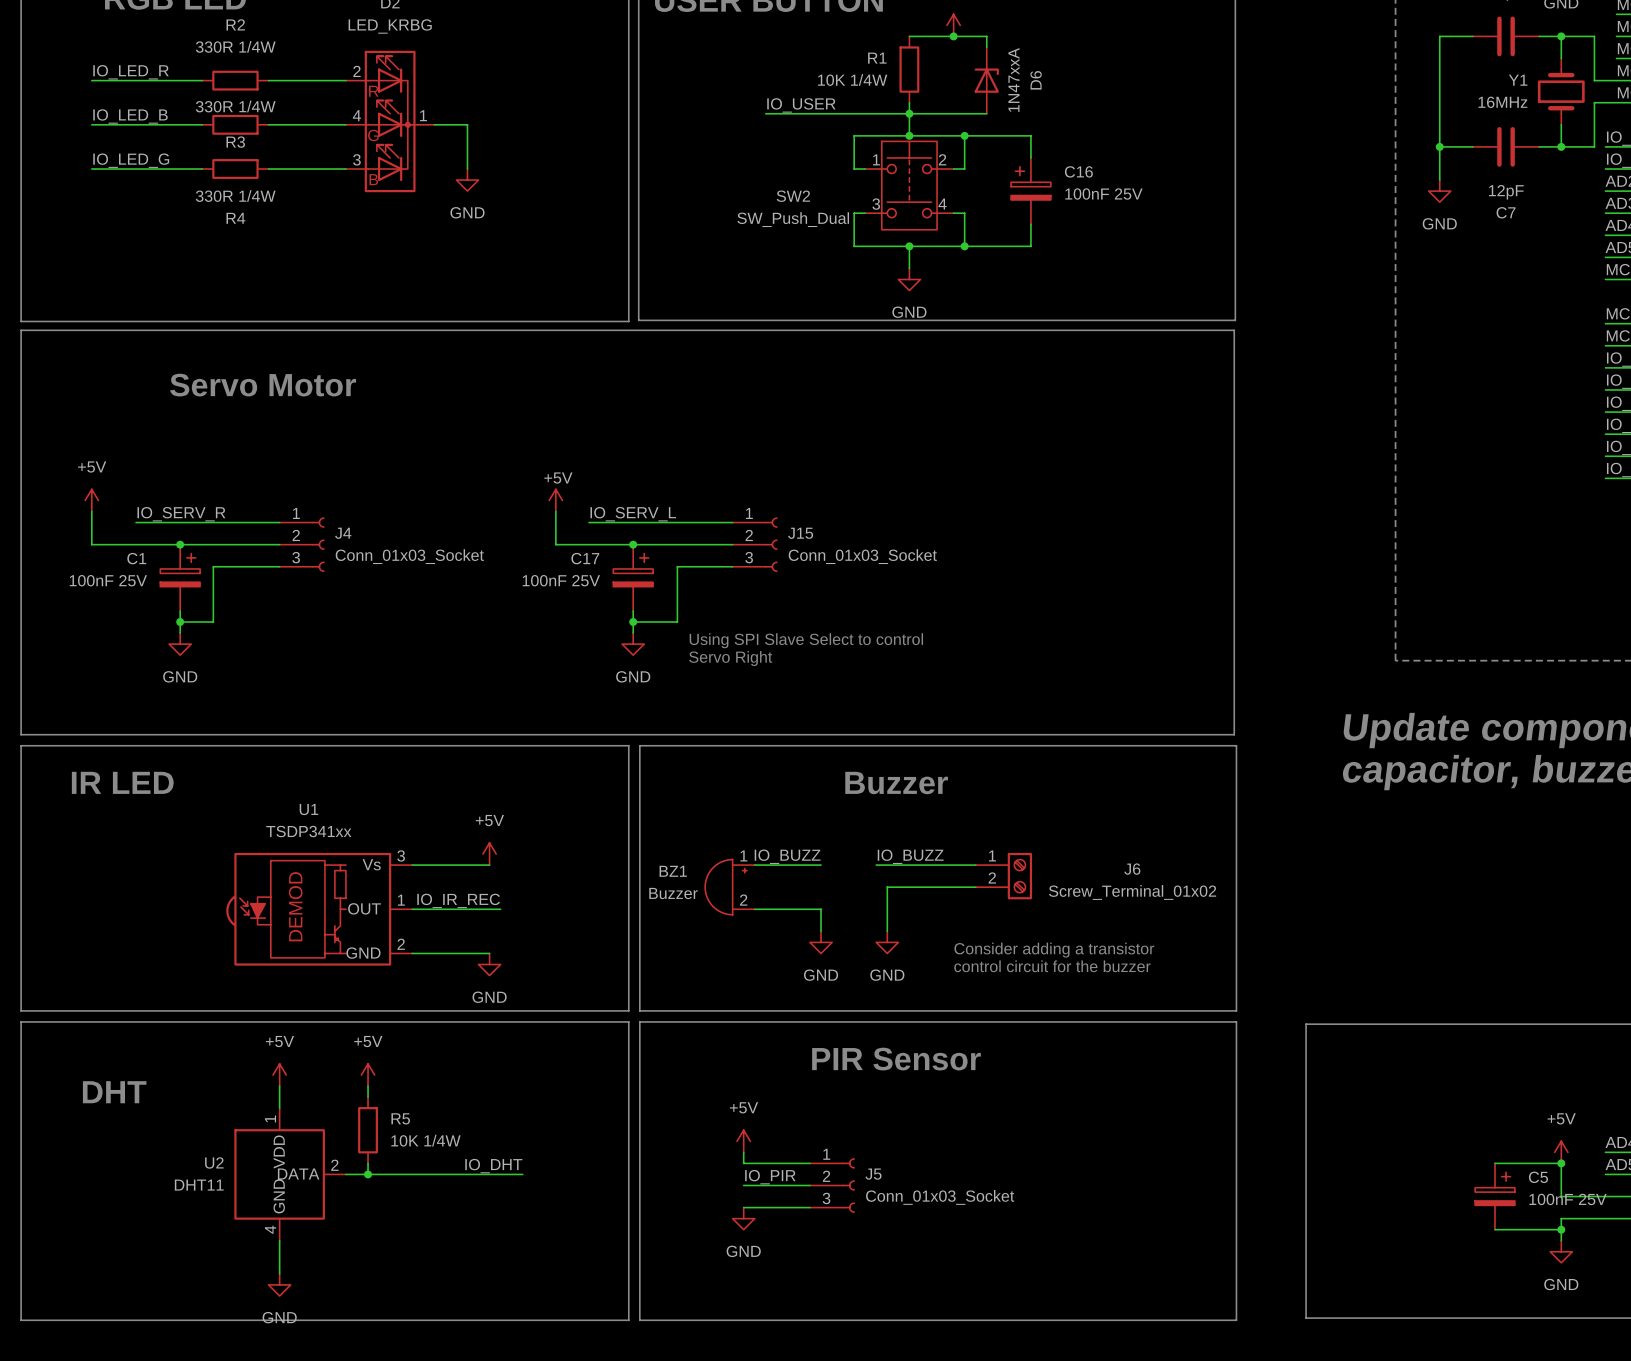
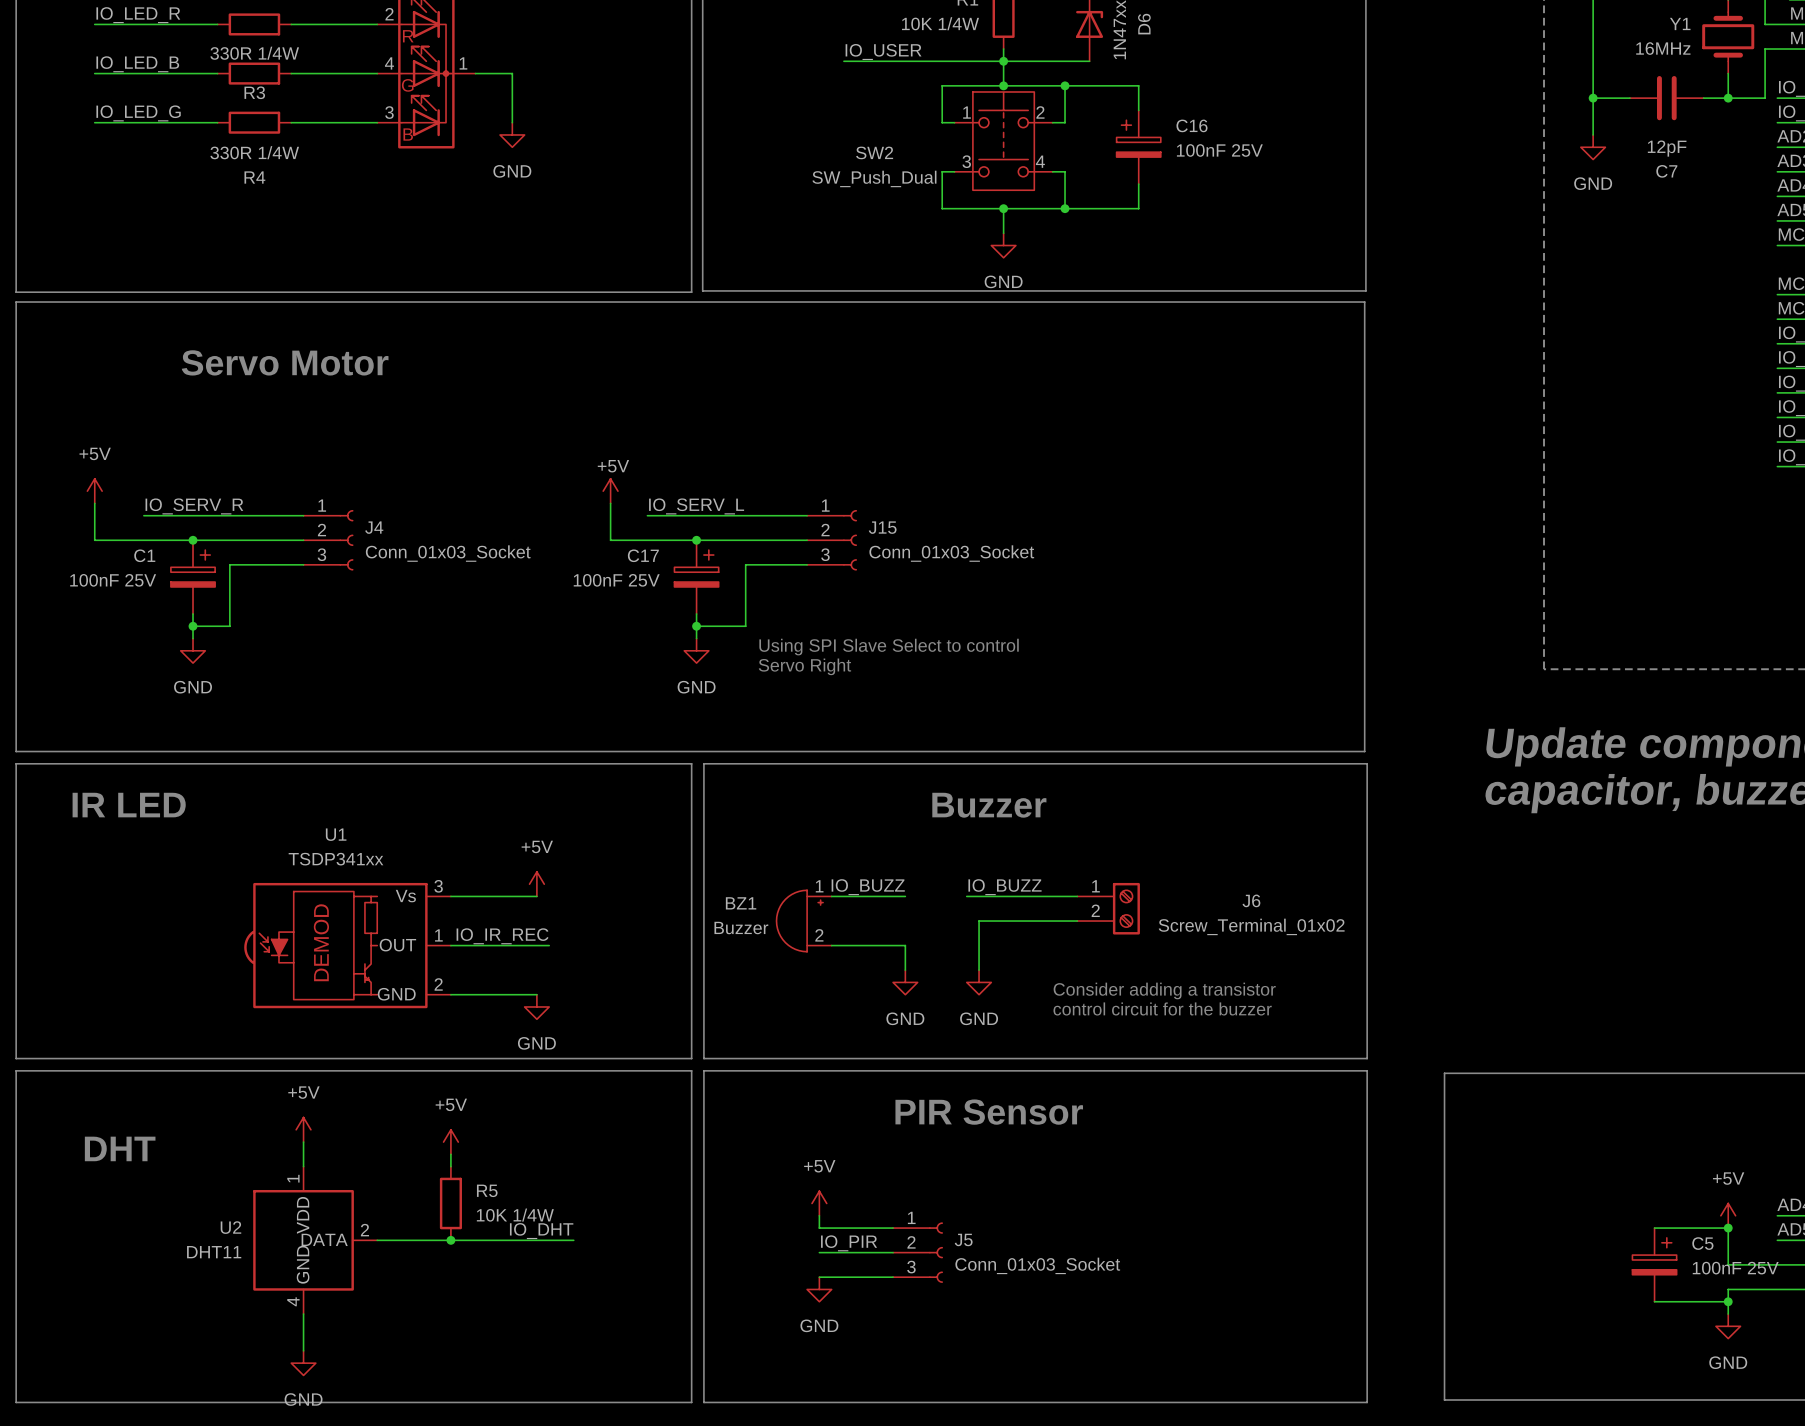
power symbol position: +5V (368, 1075) -> +5V (450, 1142)
wire: (368, 1086) (368, 1097) -> (450, 1154) (450, 1166)
R5 position: (368, 1130) -> (450, 1203)
wire: (368, 1163) (368, 1174) -> none
junction position: (368, 1174) -> (450, 1240)

